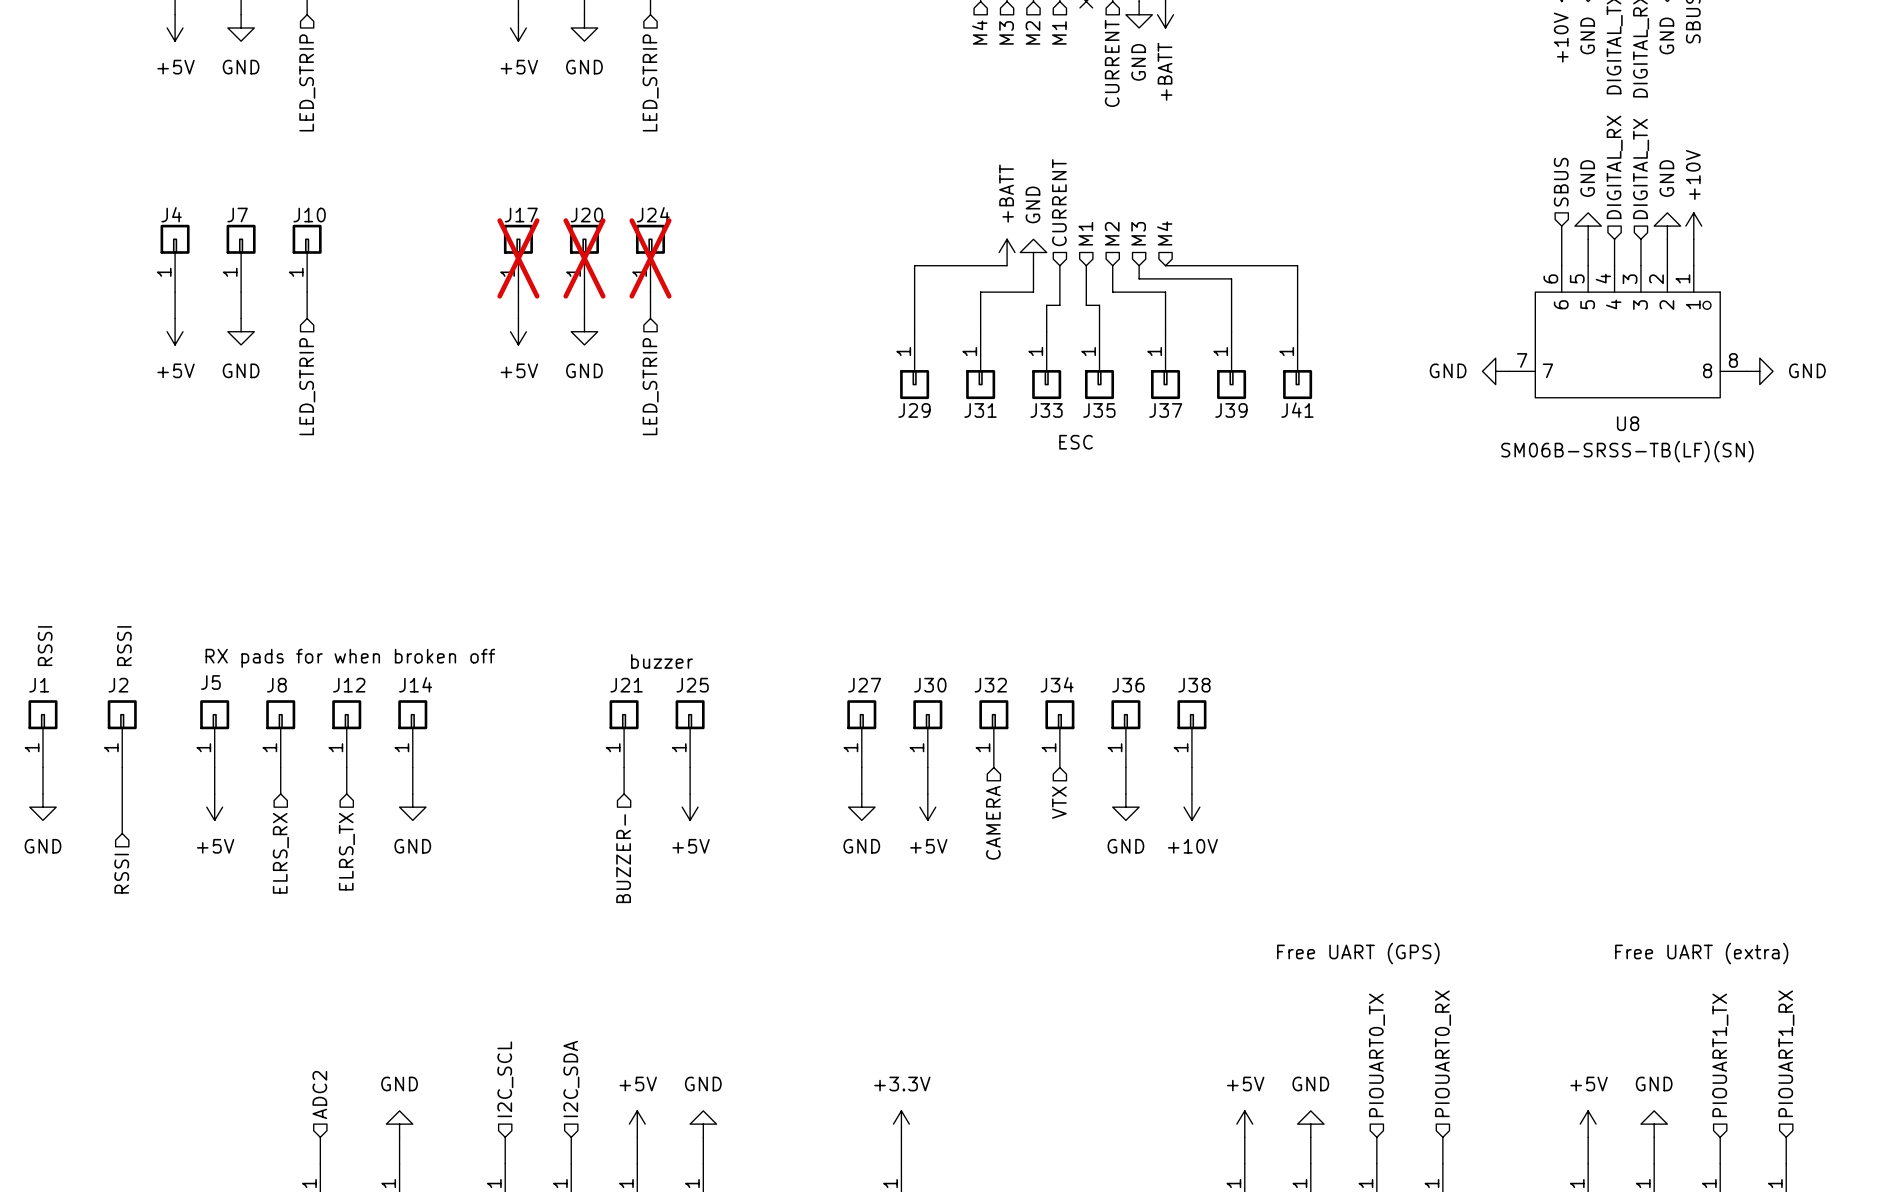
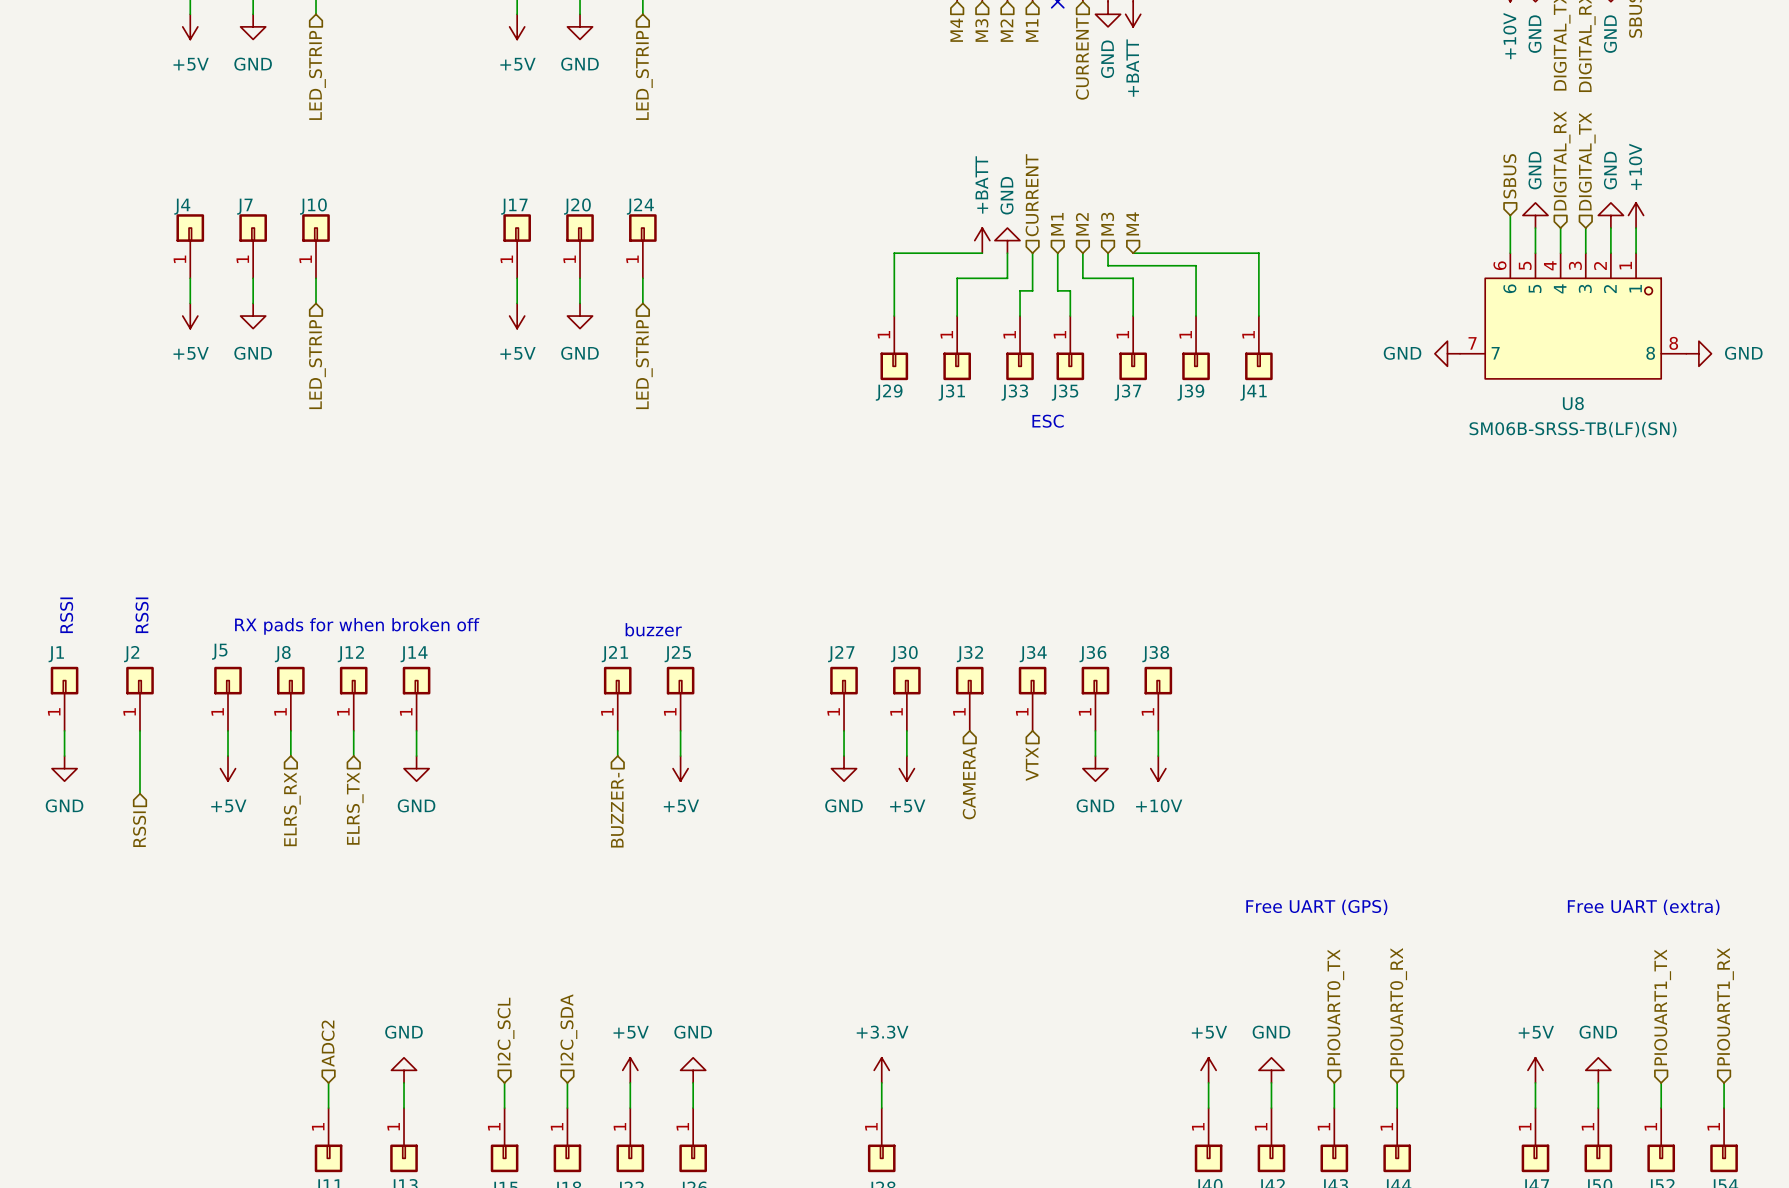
J17 do-not-place cross: (518, 258) -> none
J20 do-not-place cross: (584, 258) -> none
J24 do-not-place cross: (650, 258) -> none

